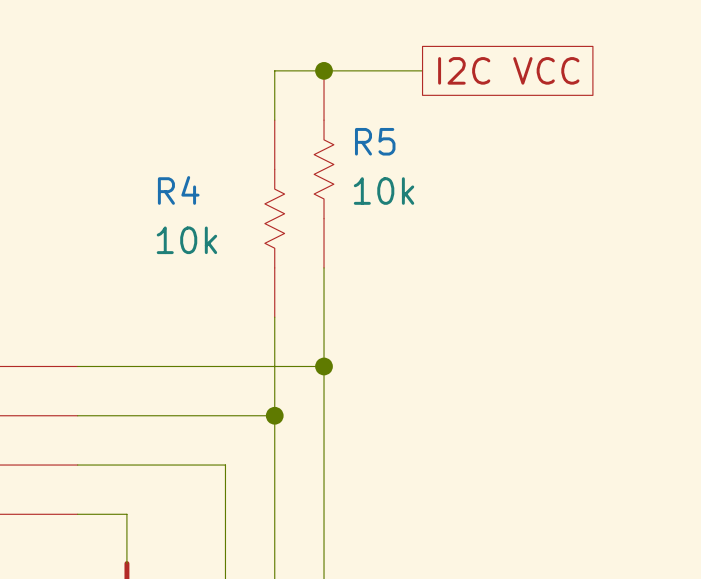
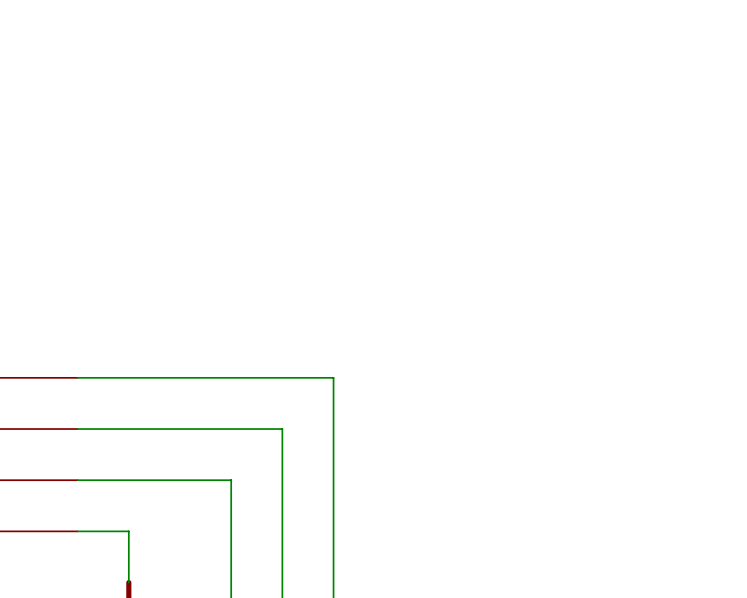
junction: (324, 70) -> none
wire: (422, 70) (274, 70) (274, 120) -> none
global label: I2C VCC (508, 70) -> none
R5: 10k (324, 169) -> none
R4: 10k (274, 218) -> none
wire: (324, 267) (324, 366) -> none
wire: (274, 317) (274, 415) -> none
junction: (324, 366) -> none
junction: (274, 415) -> none

